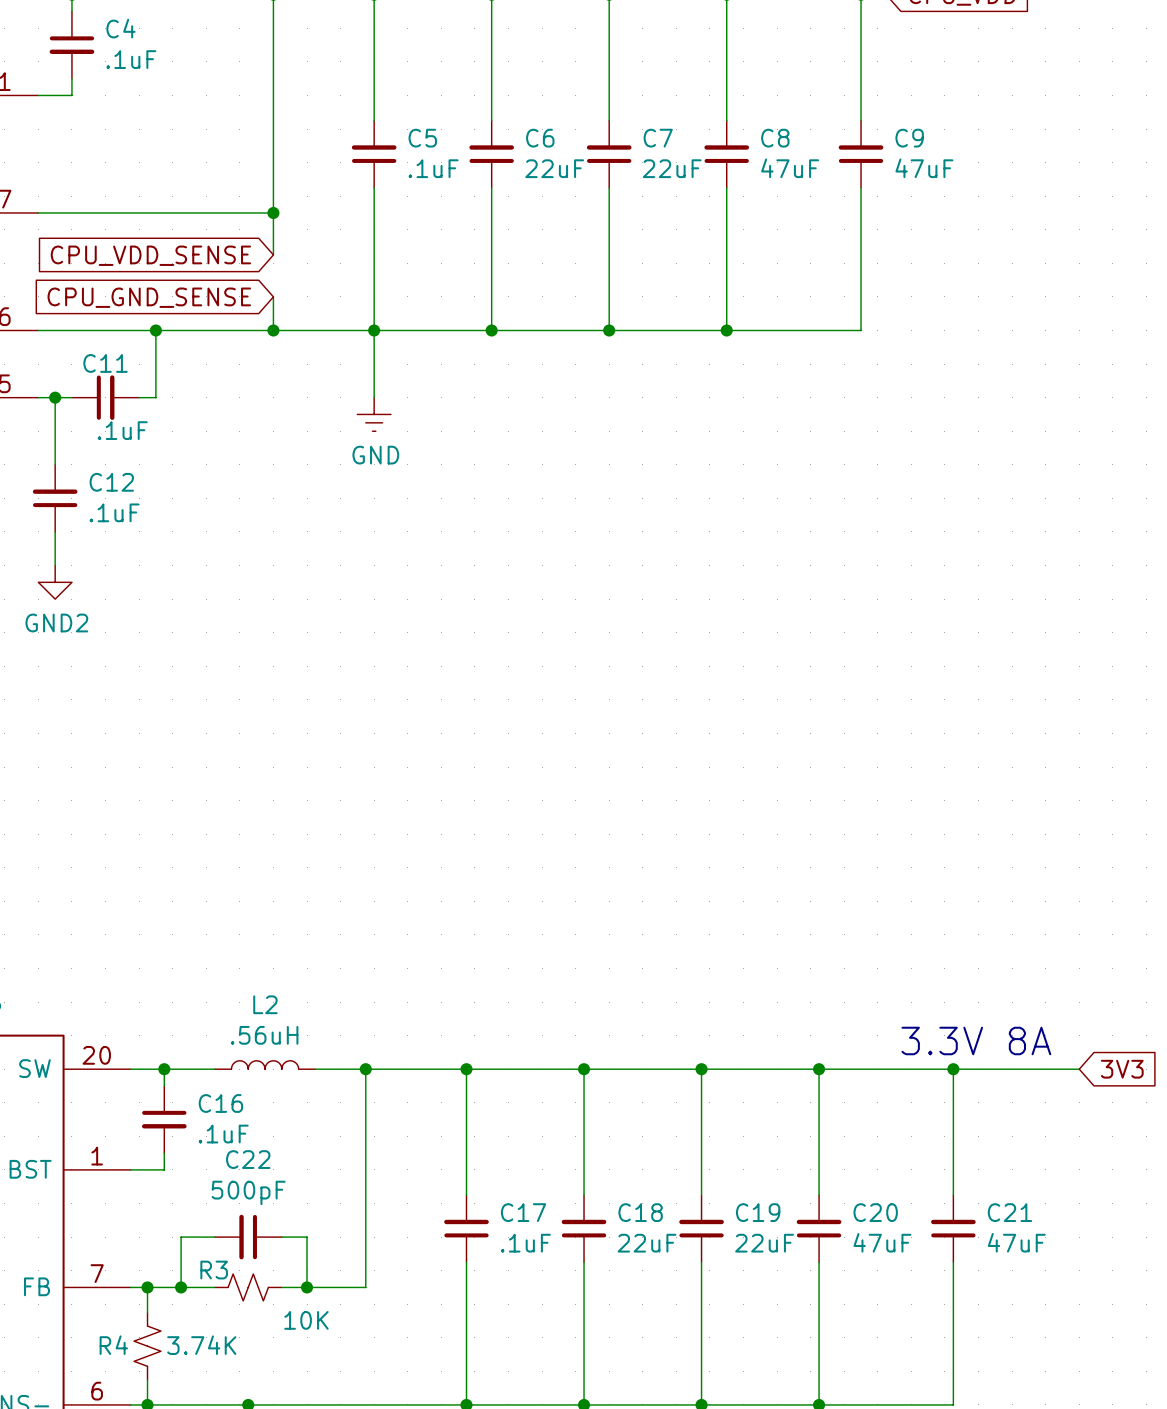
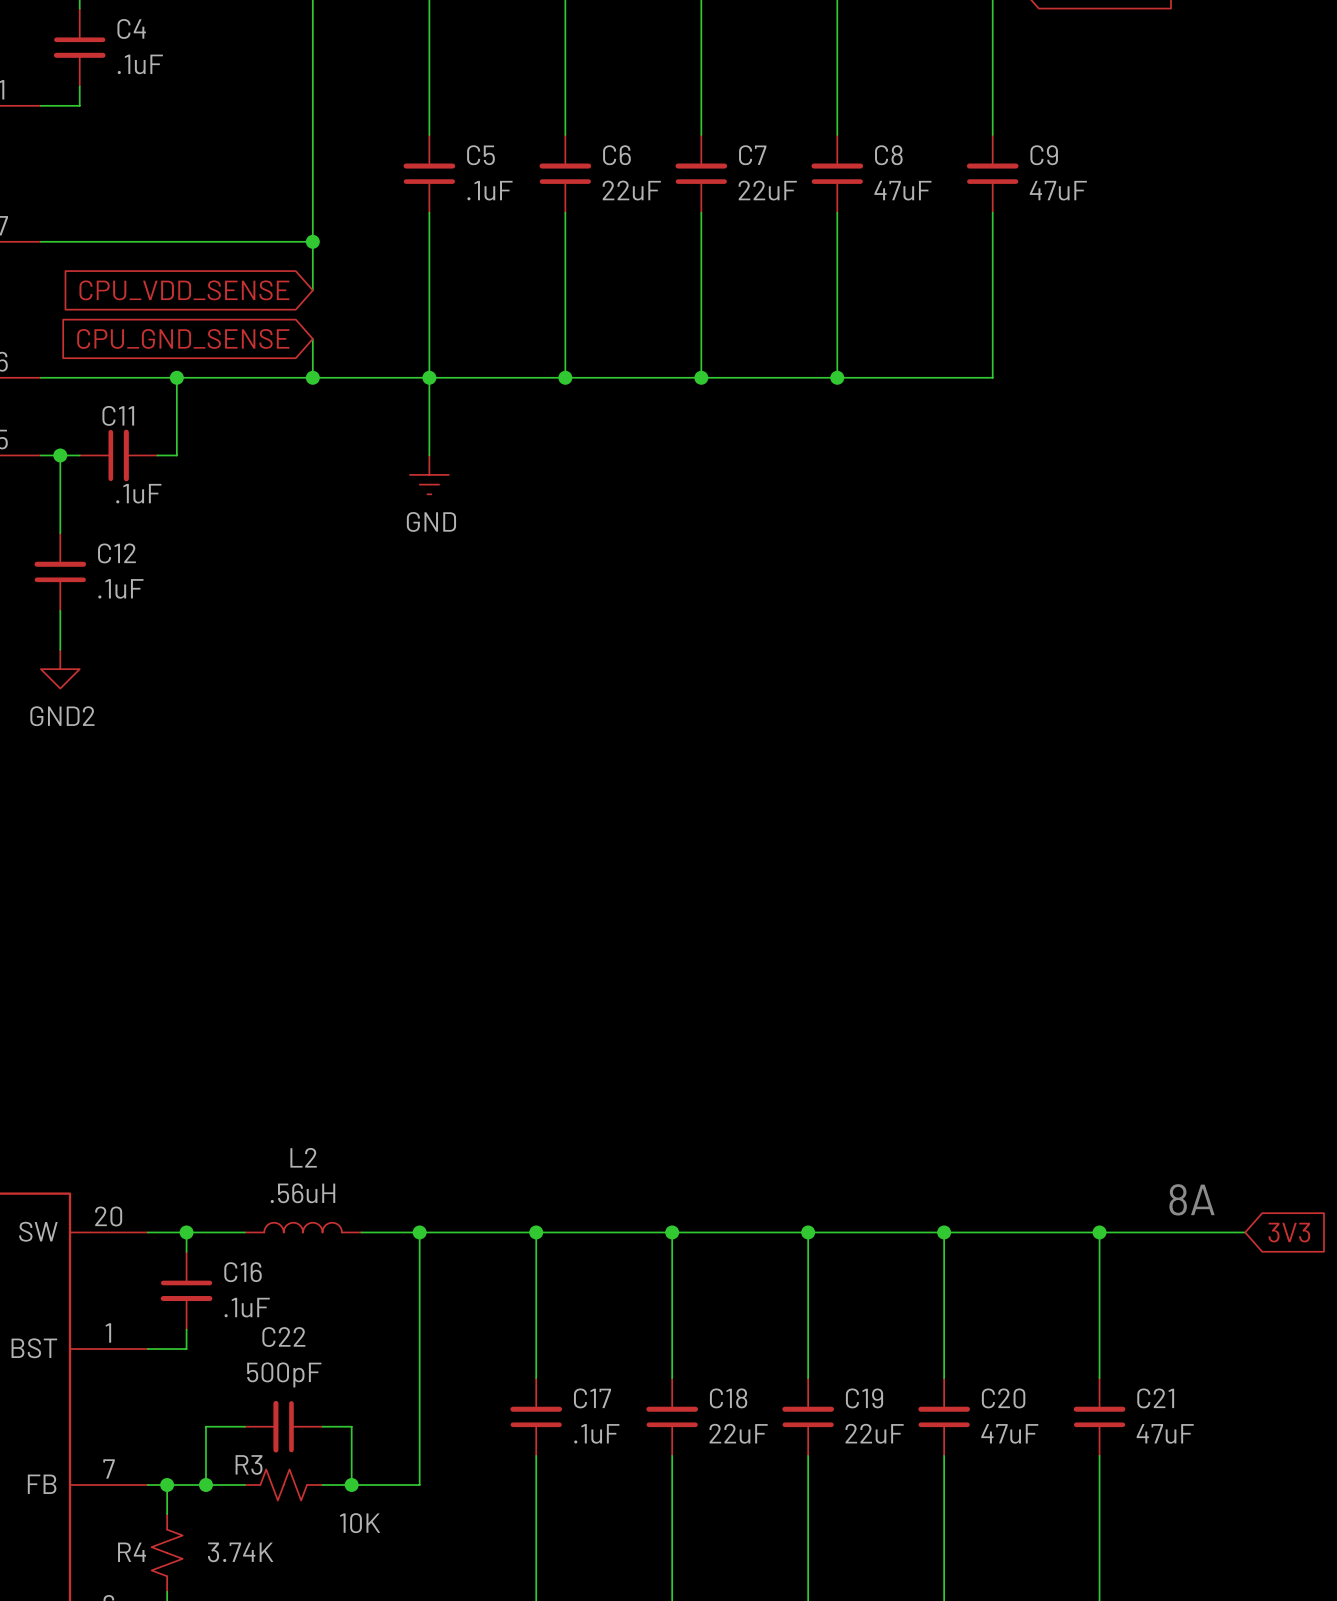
text: 3.3V 8A (976, 1040) -> 8A (1191, 1199)

